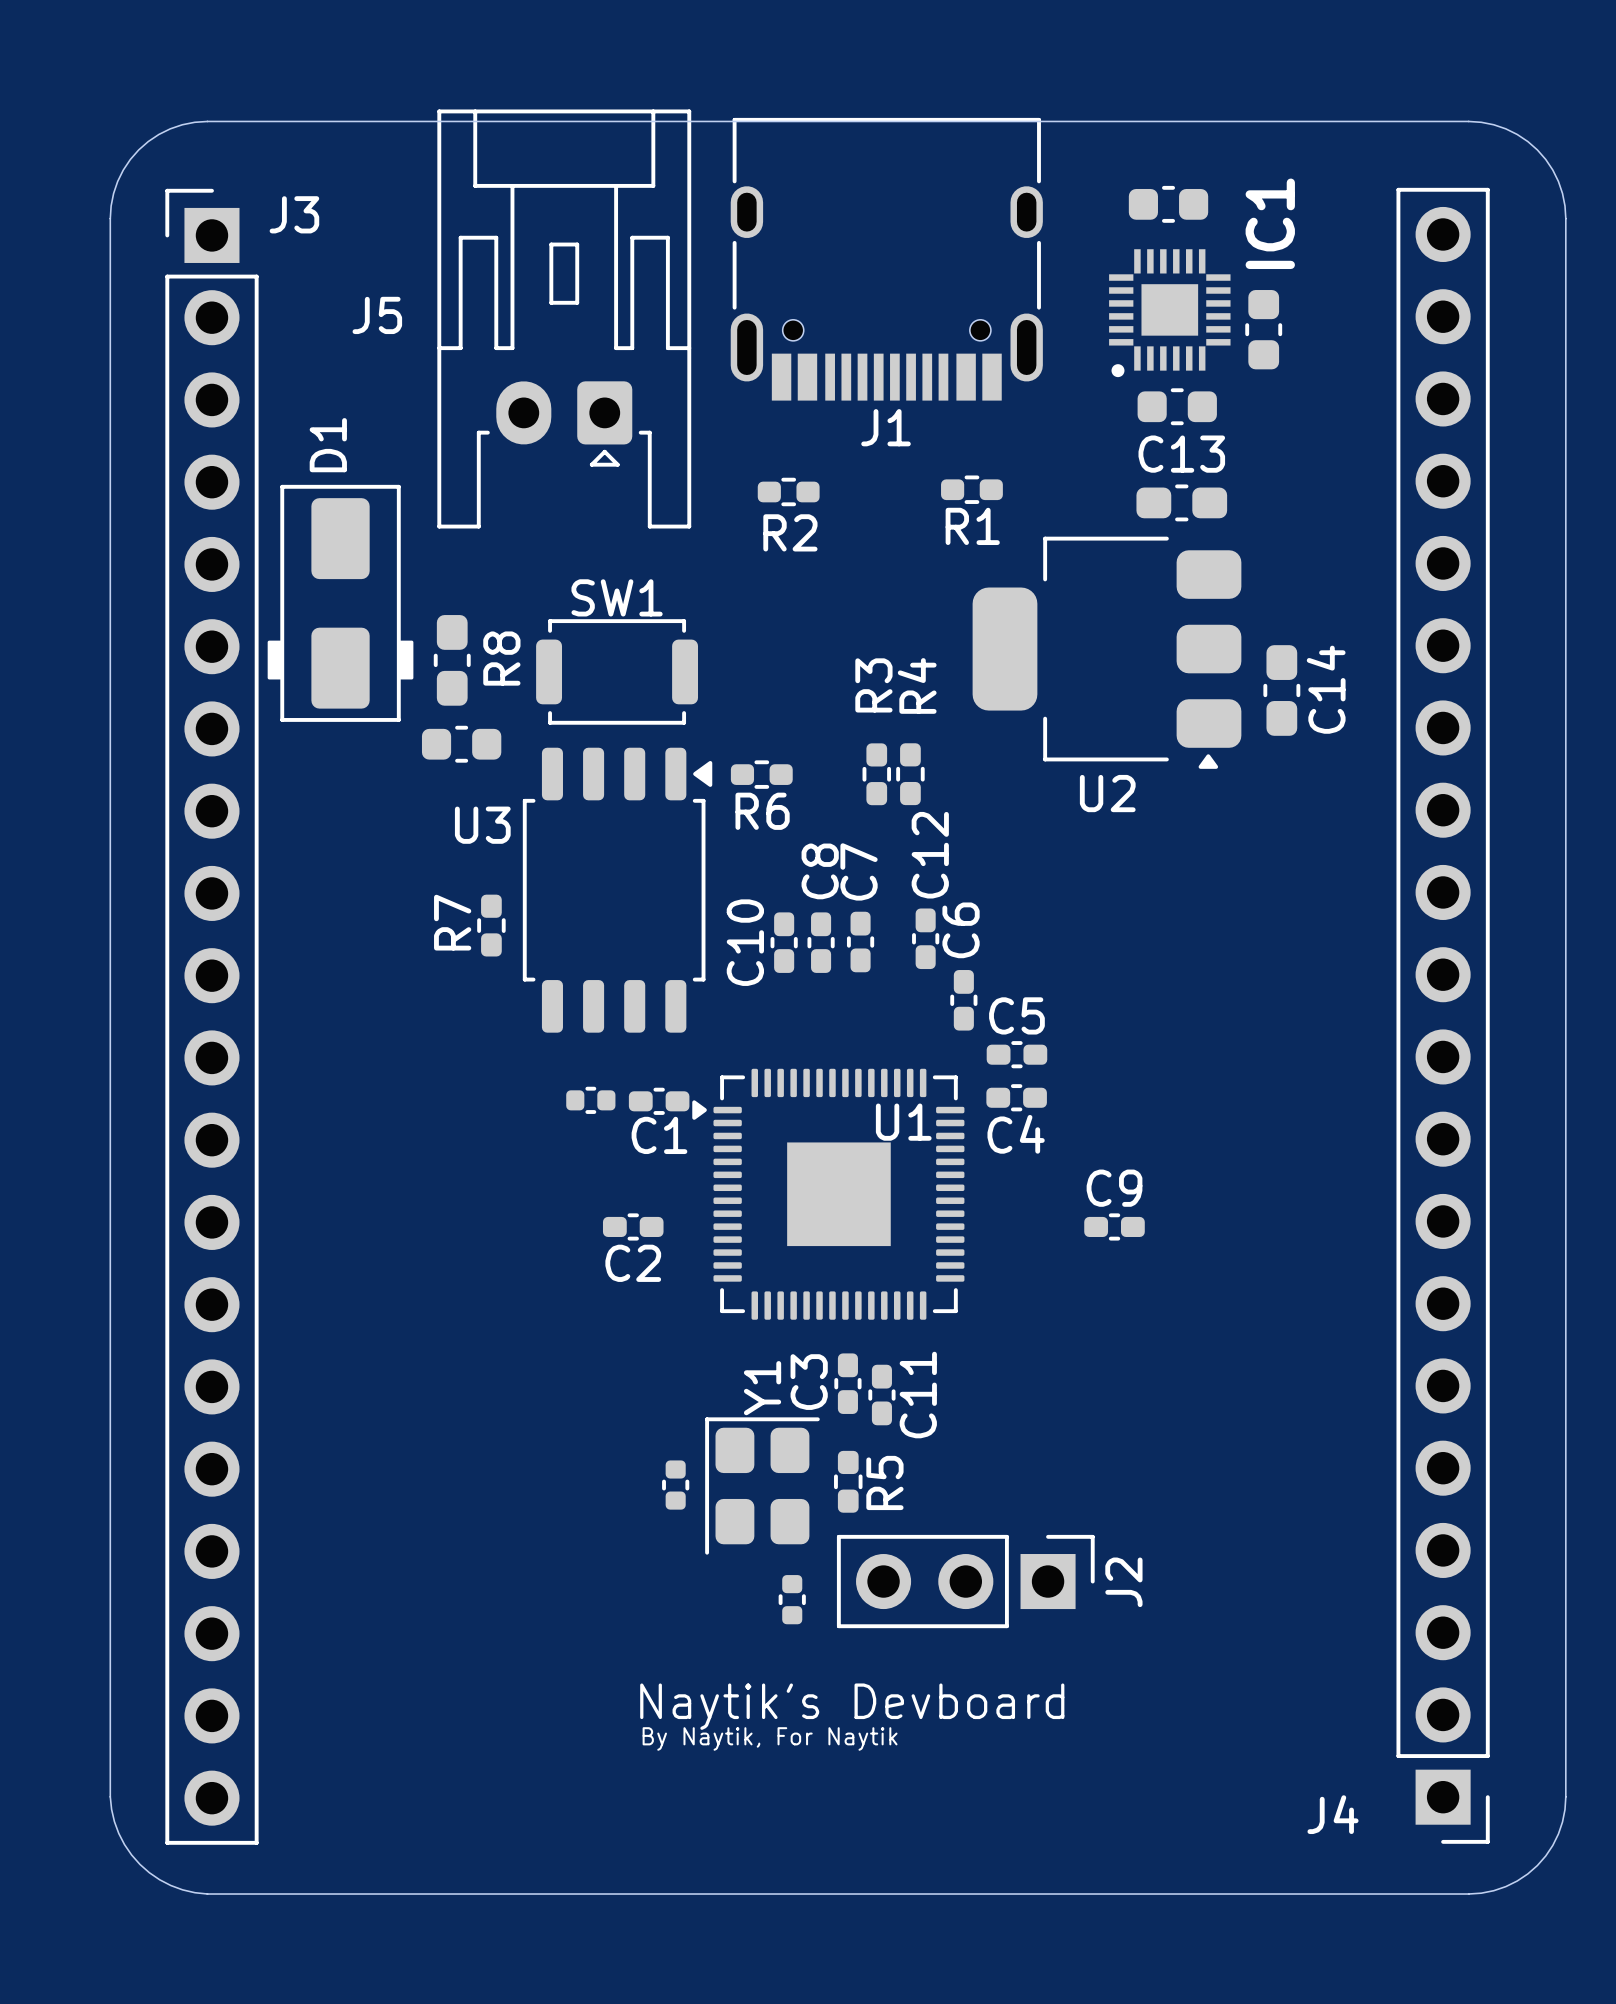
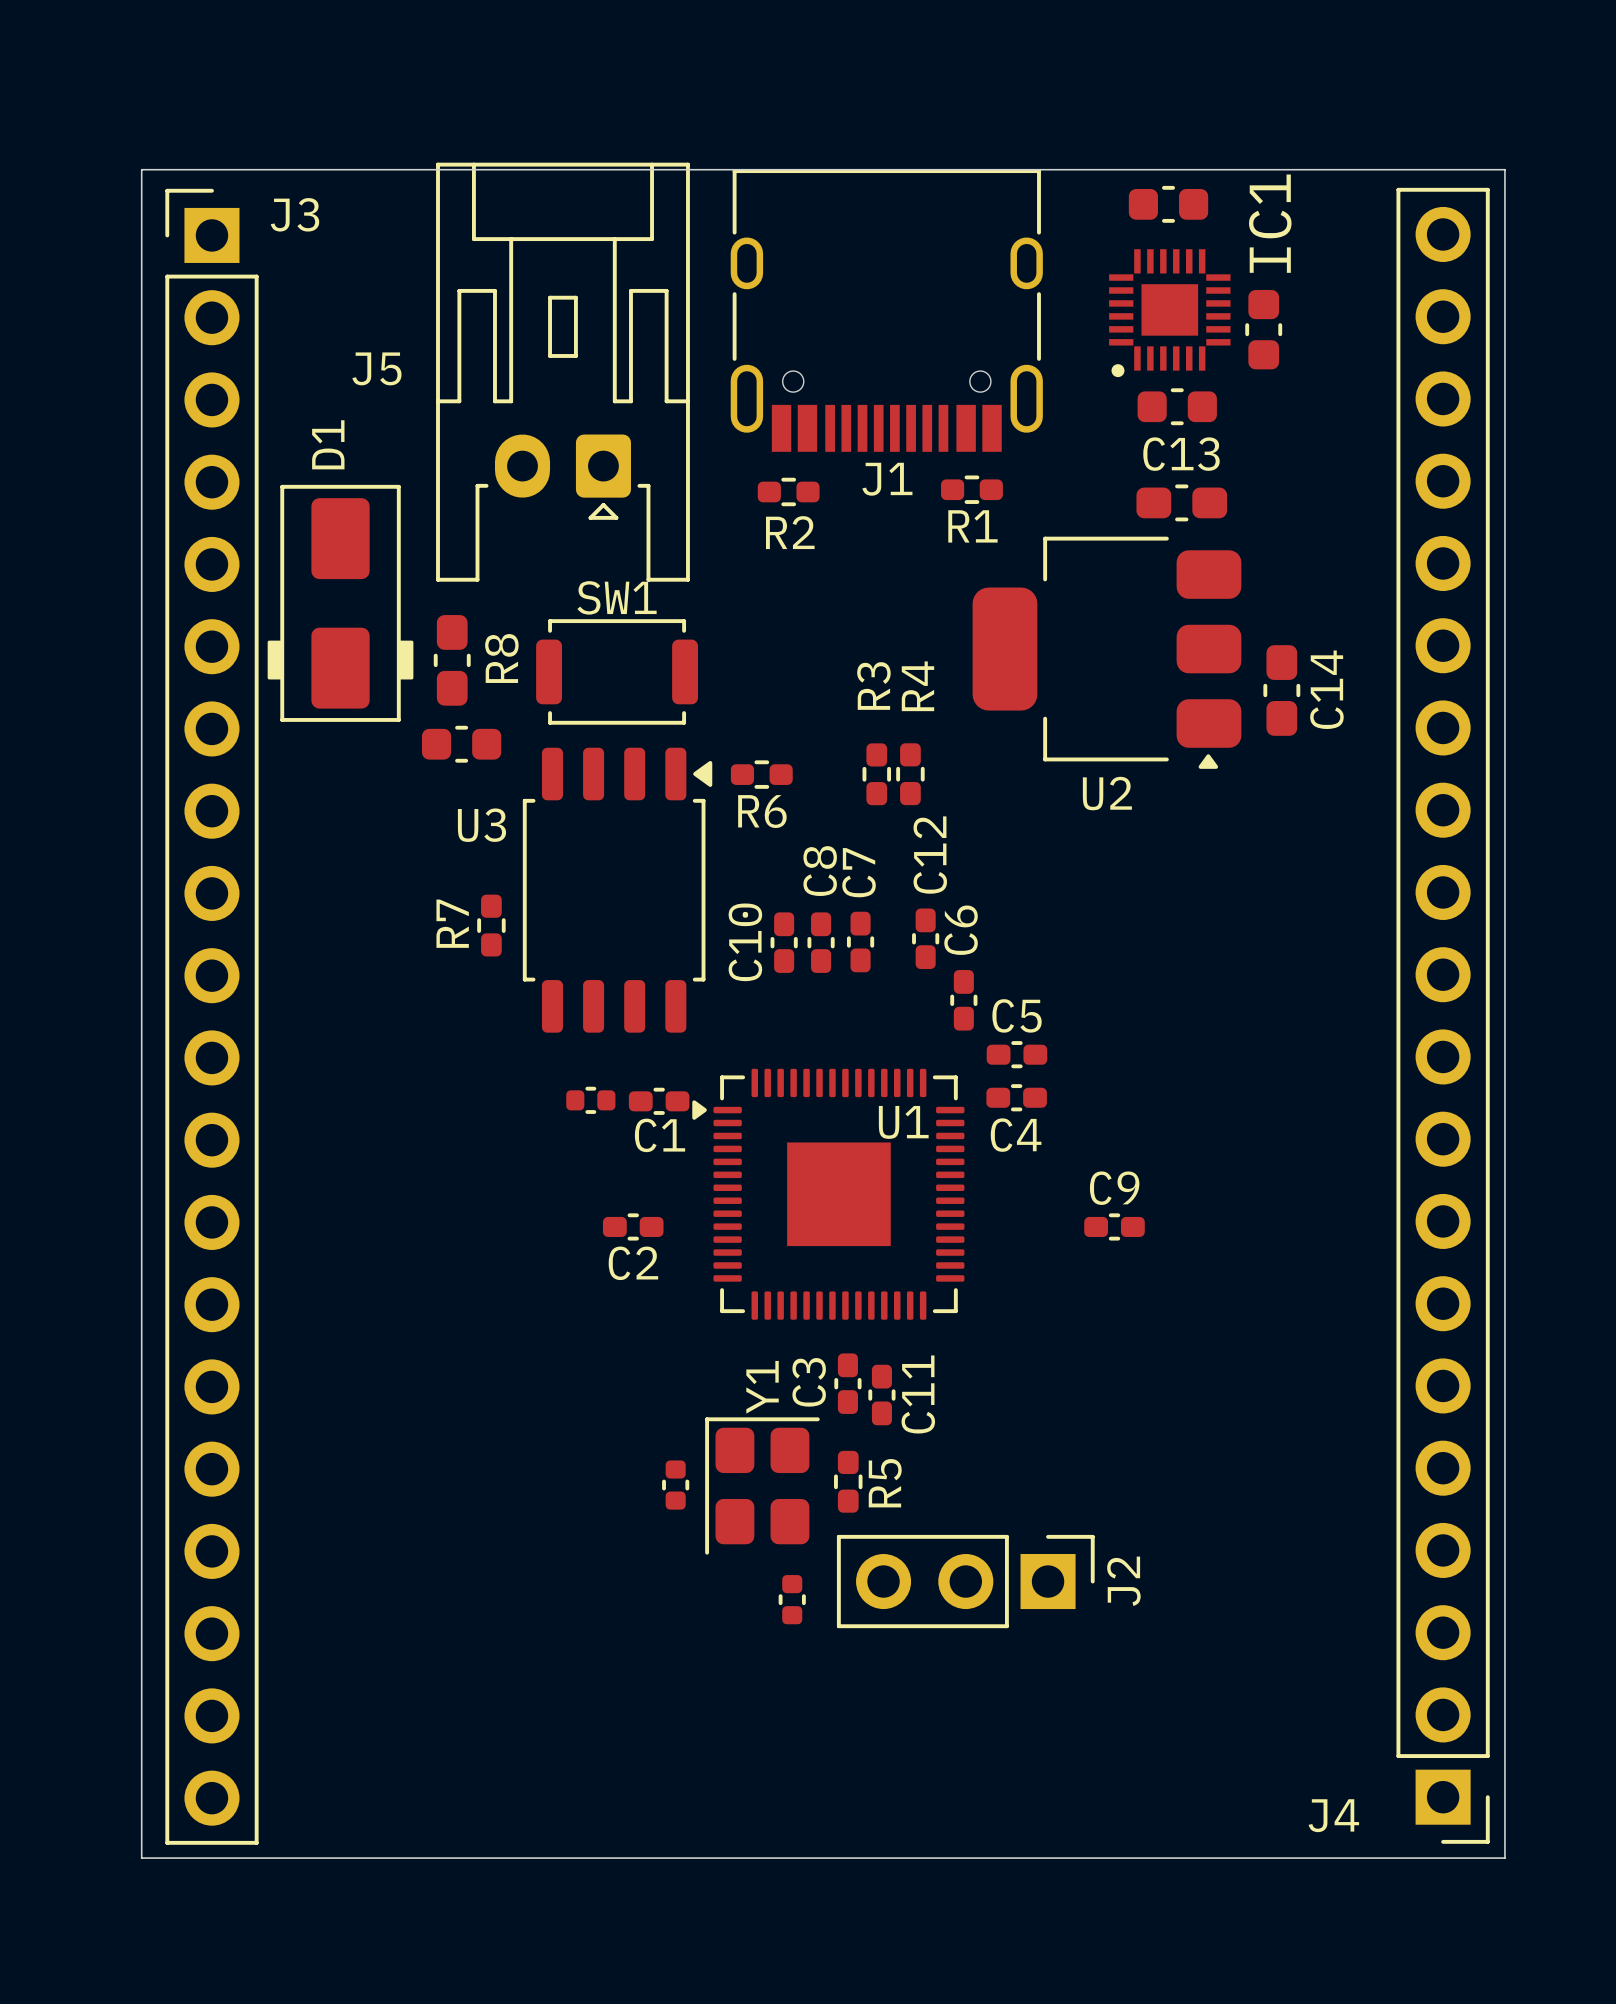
board edge: (207, 121) (1468, 121) (1493, 124) (1505, 128) (1527, 141) (1545, 159) (1552, 170) (1562, 193) (1565, 218) (1565, 1796) (1564, 1809) (1558, 1834) (1545, 1856) (1527, 1873) (1505, 1886) (1493, 1890) (1468, 1894) (207, 1894) (194, 1892) (170, 1885) (149, 1872) (131, 1854) (124, 1844) (114, 1821) (110, 1796) (110, 218) (113, 193) (117, 181) (130, 159) (138, 149) (158, 134) (170, 128) (182, 124) (207, 121) -> (141, 169) (141, 1858) (1504, 1858) (1504, 169) (141, 169)
J1 position: (886, 259) -> (886, 310)
J5 position: (564, 318) -> (562, 372)
text: Naytik's Devboard (852, 1706) -> none
text: By Naytik, For Naytik (770, 1738) -> none

